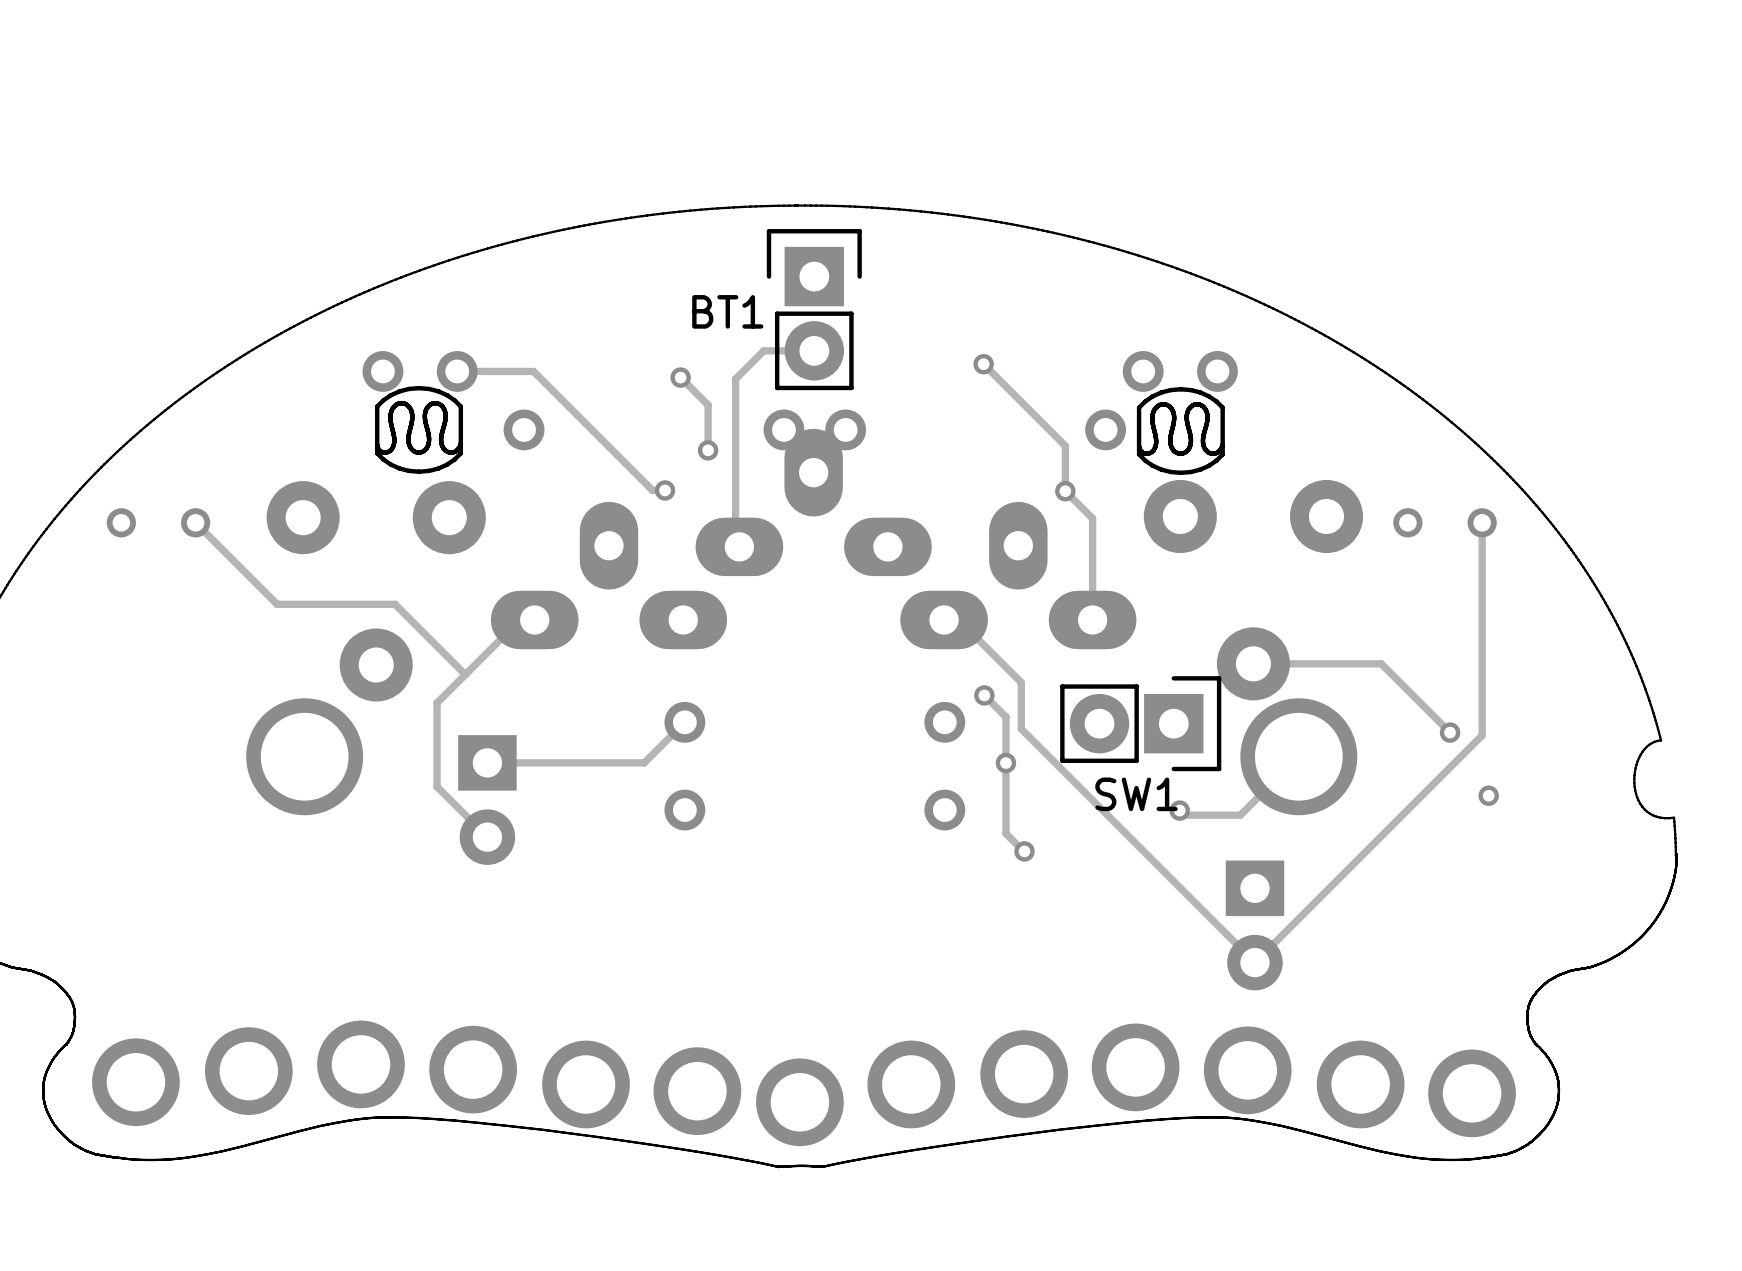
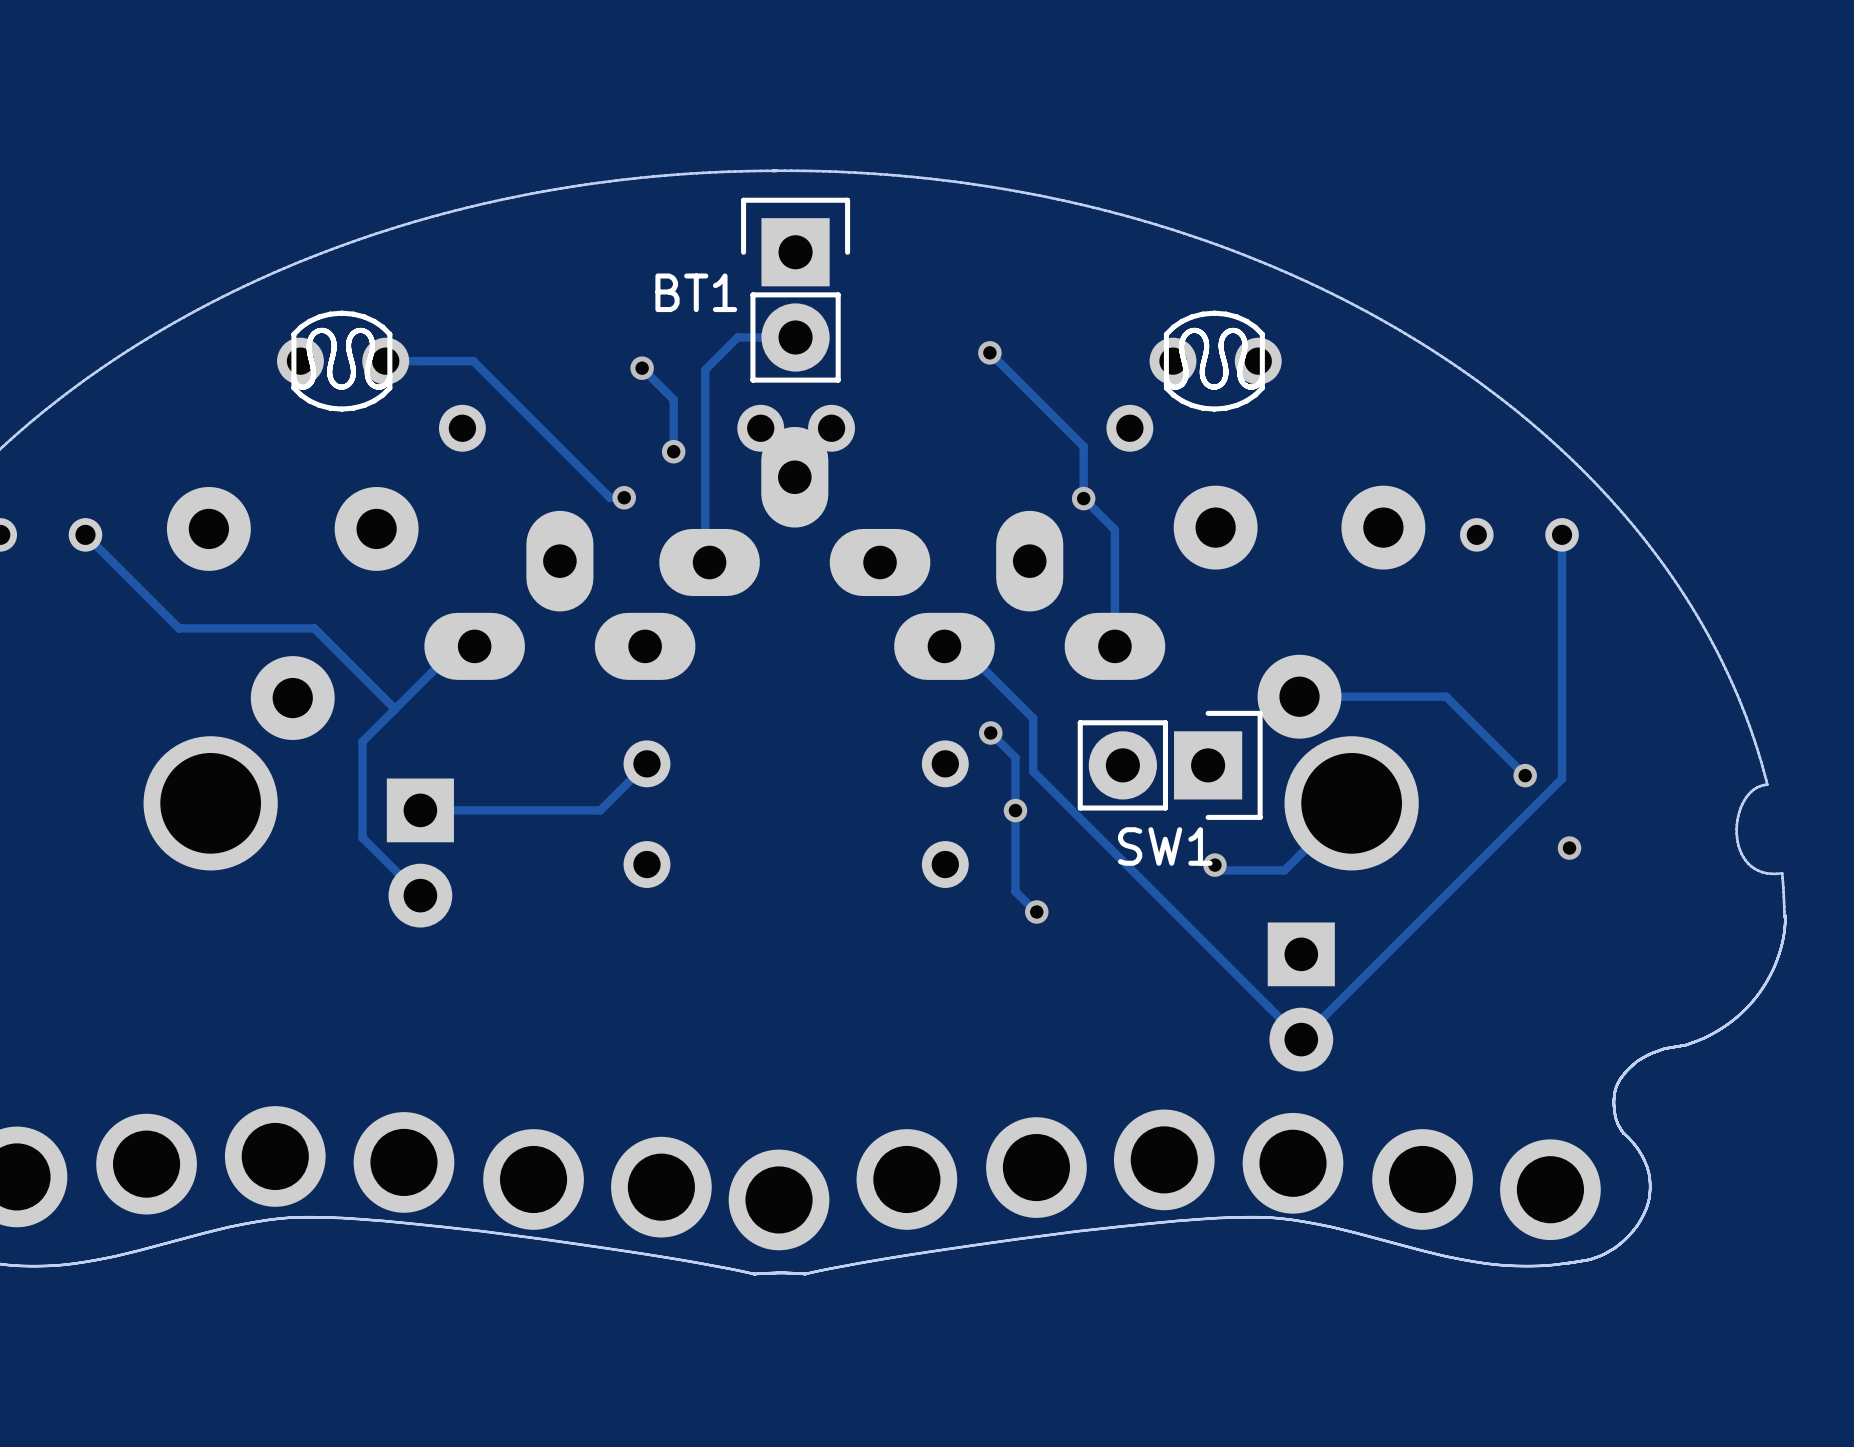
drawing position: (419, 429) -> (341, 361)
drawing position: (1180, 431) -> (1214, 361)

